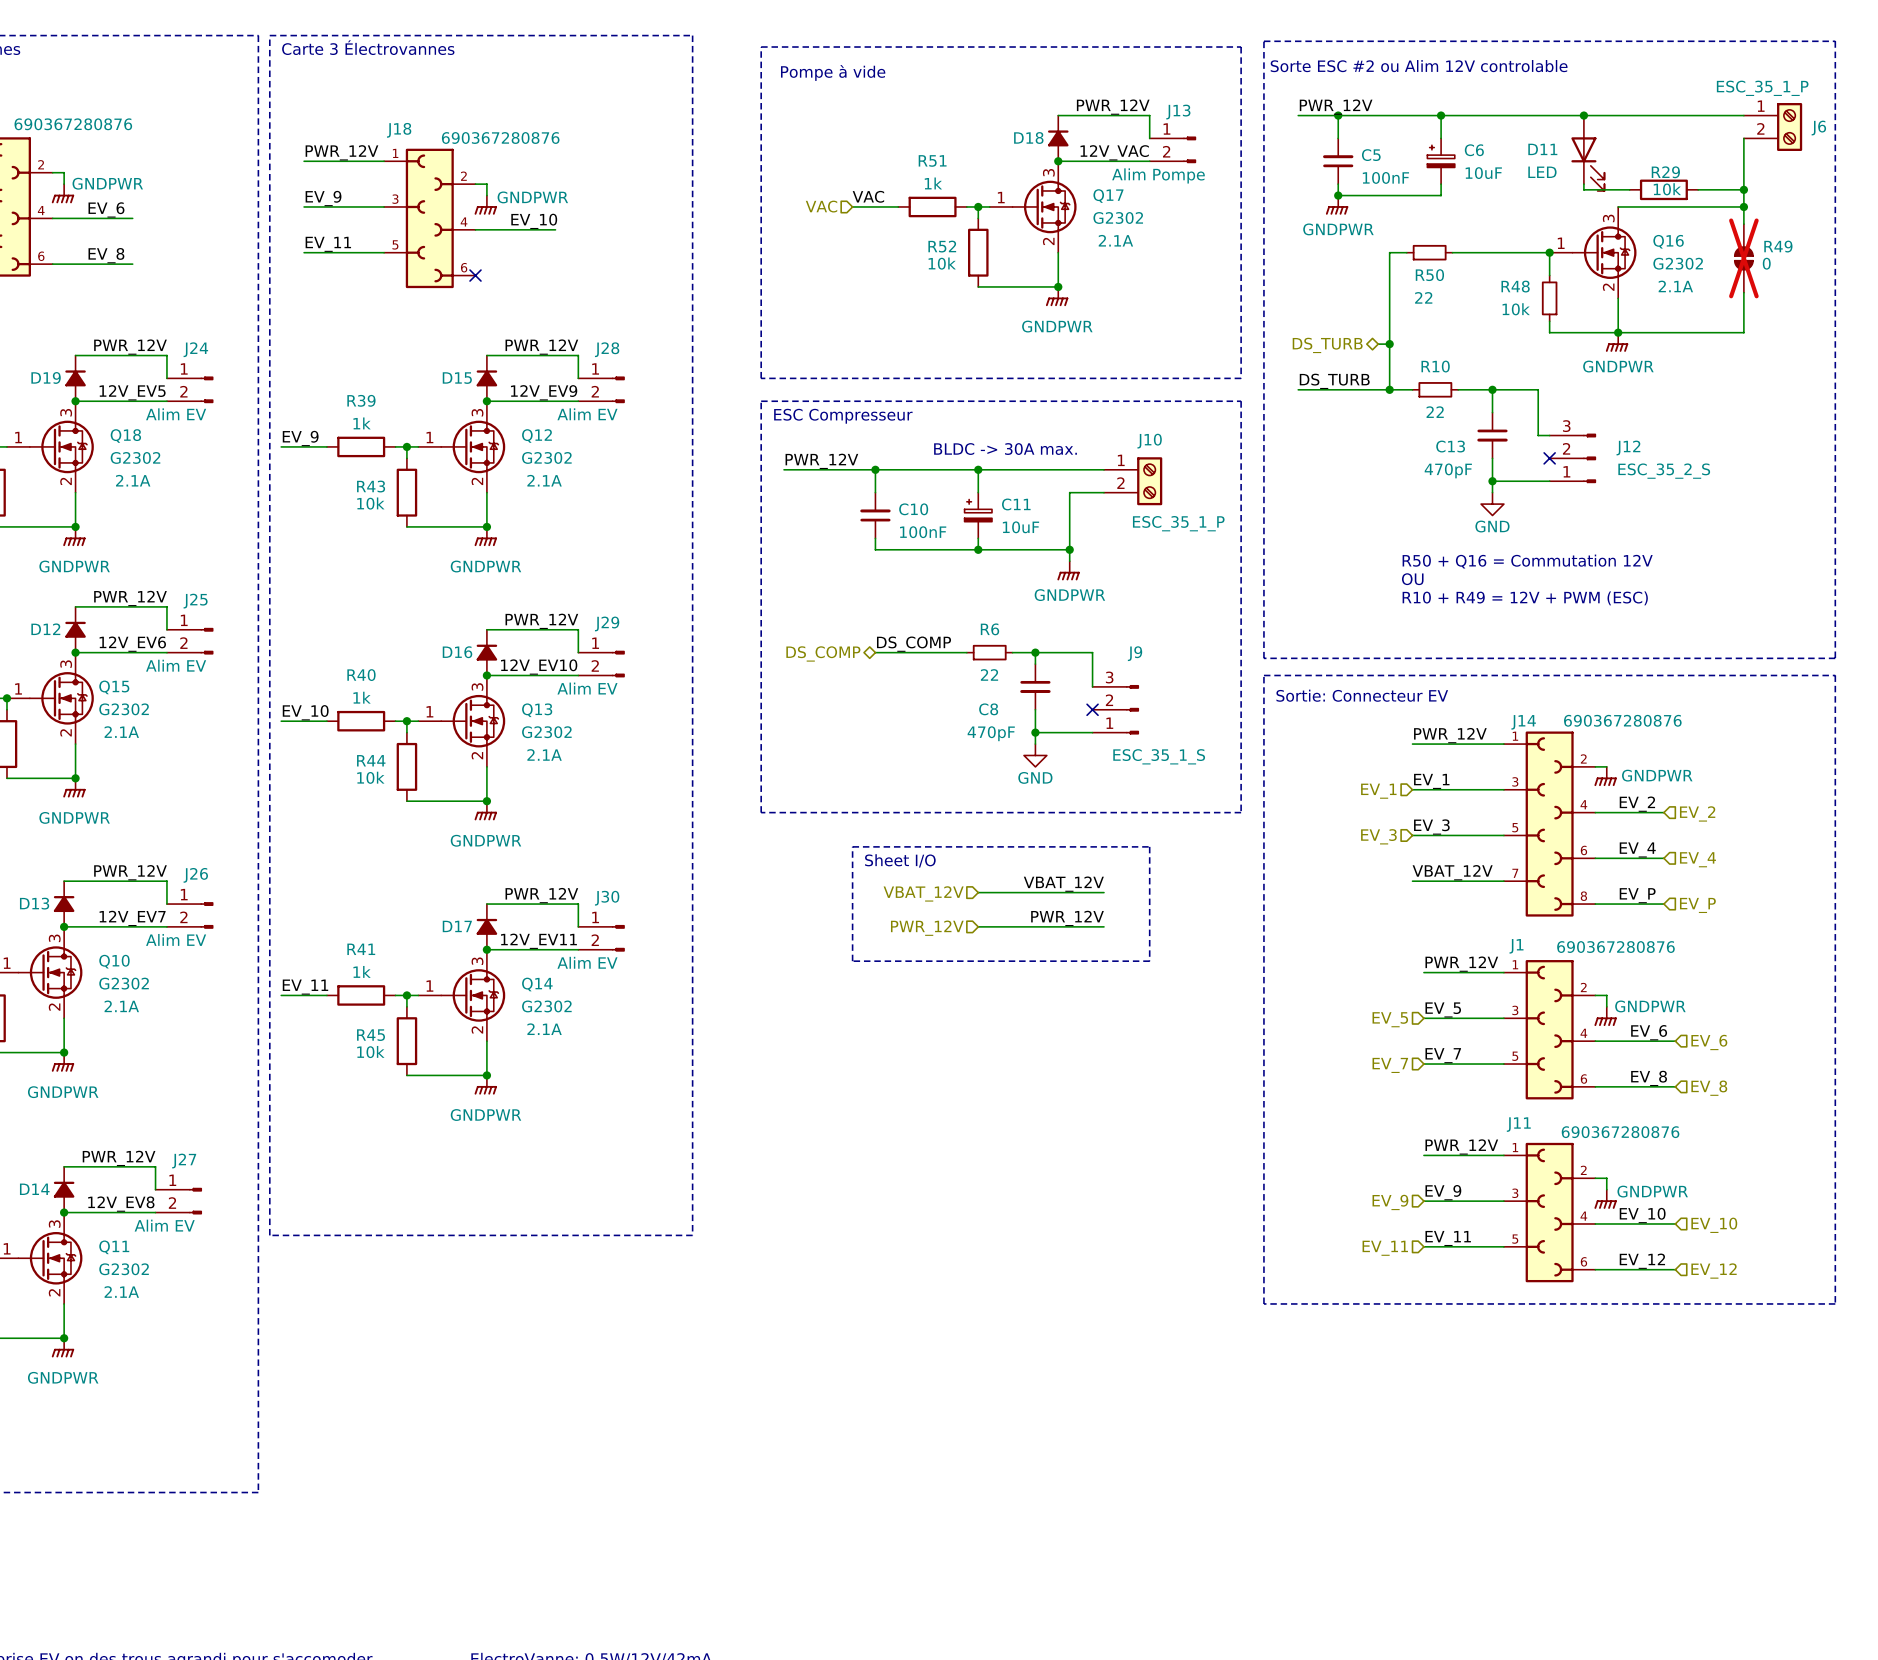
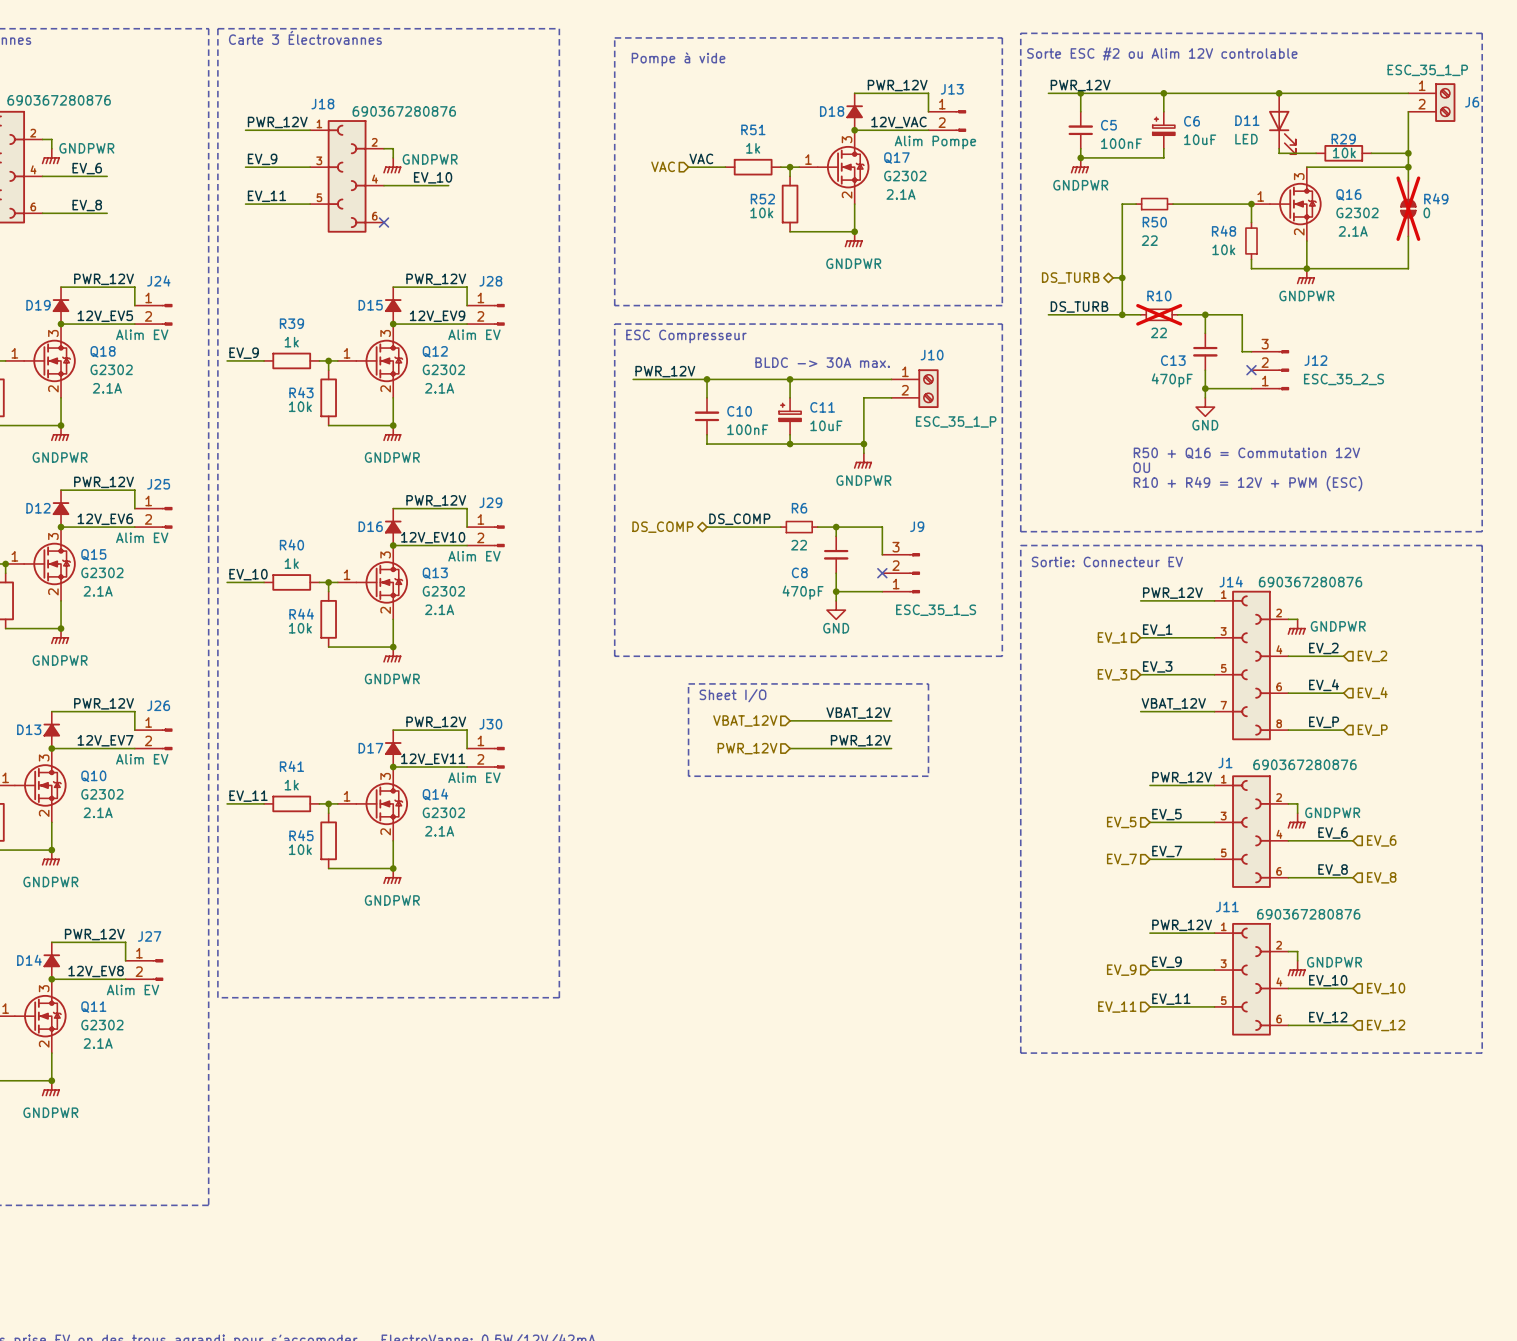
R10 do-not-place cross: none -> (1159, 314)

